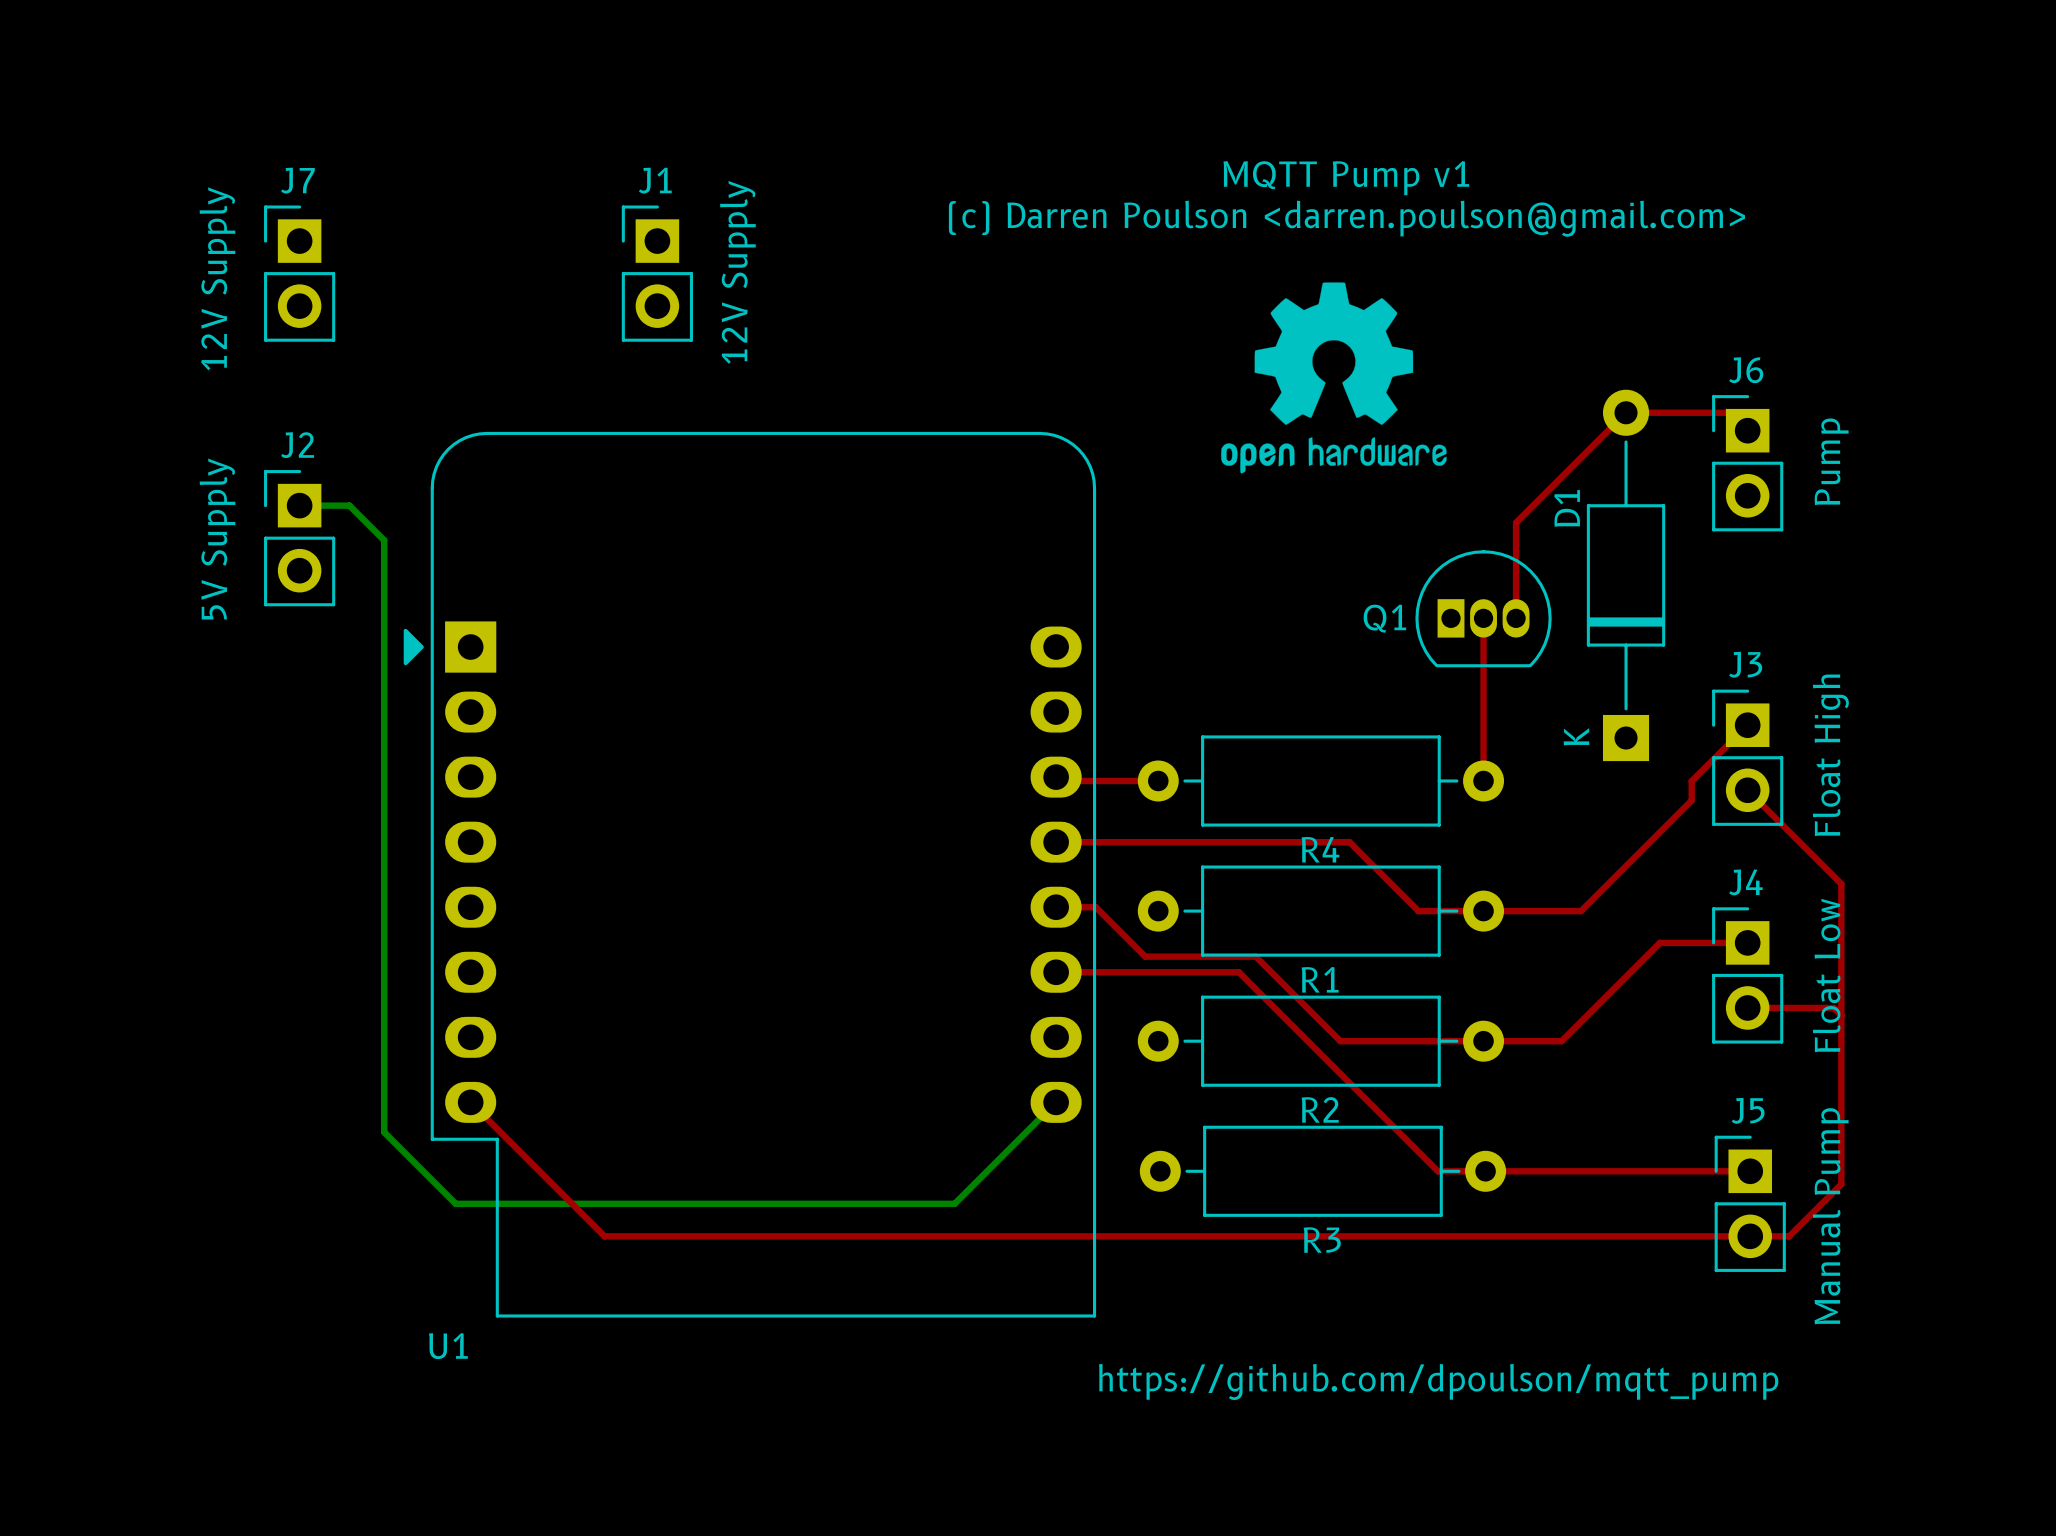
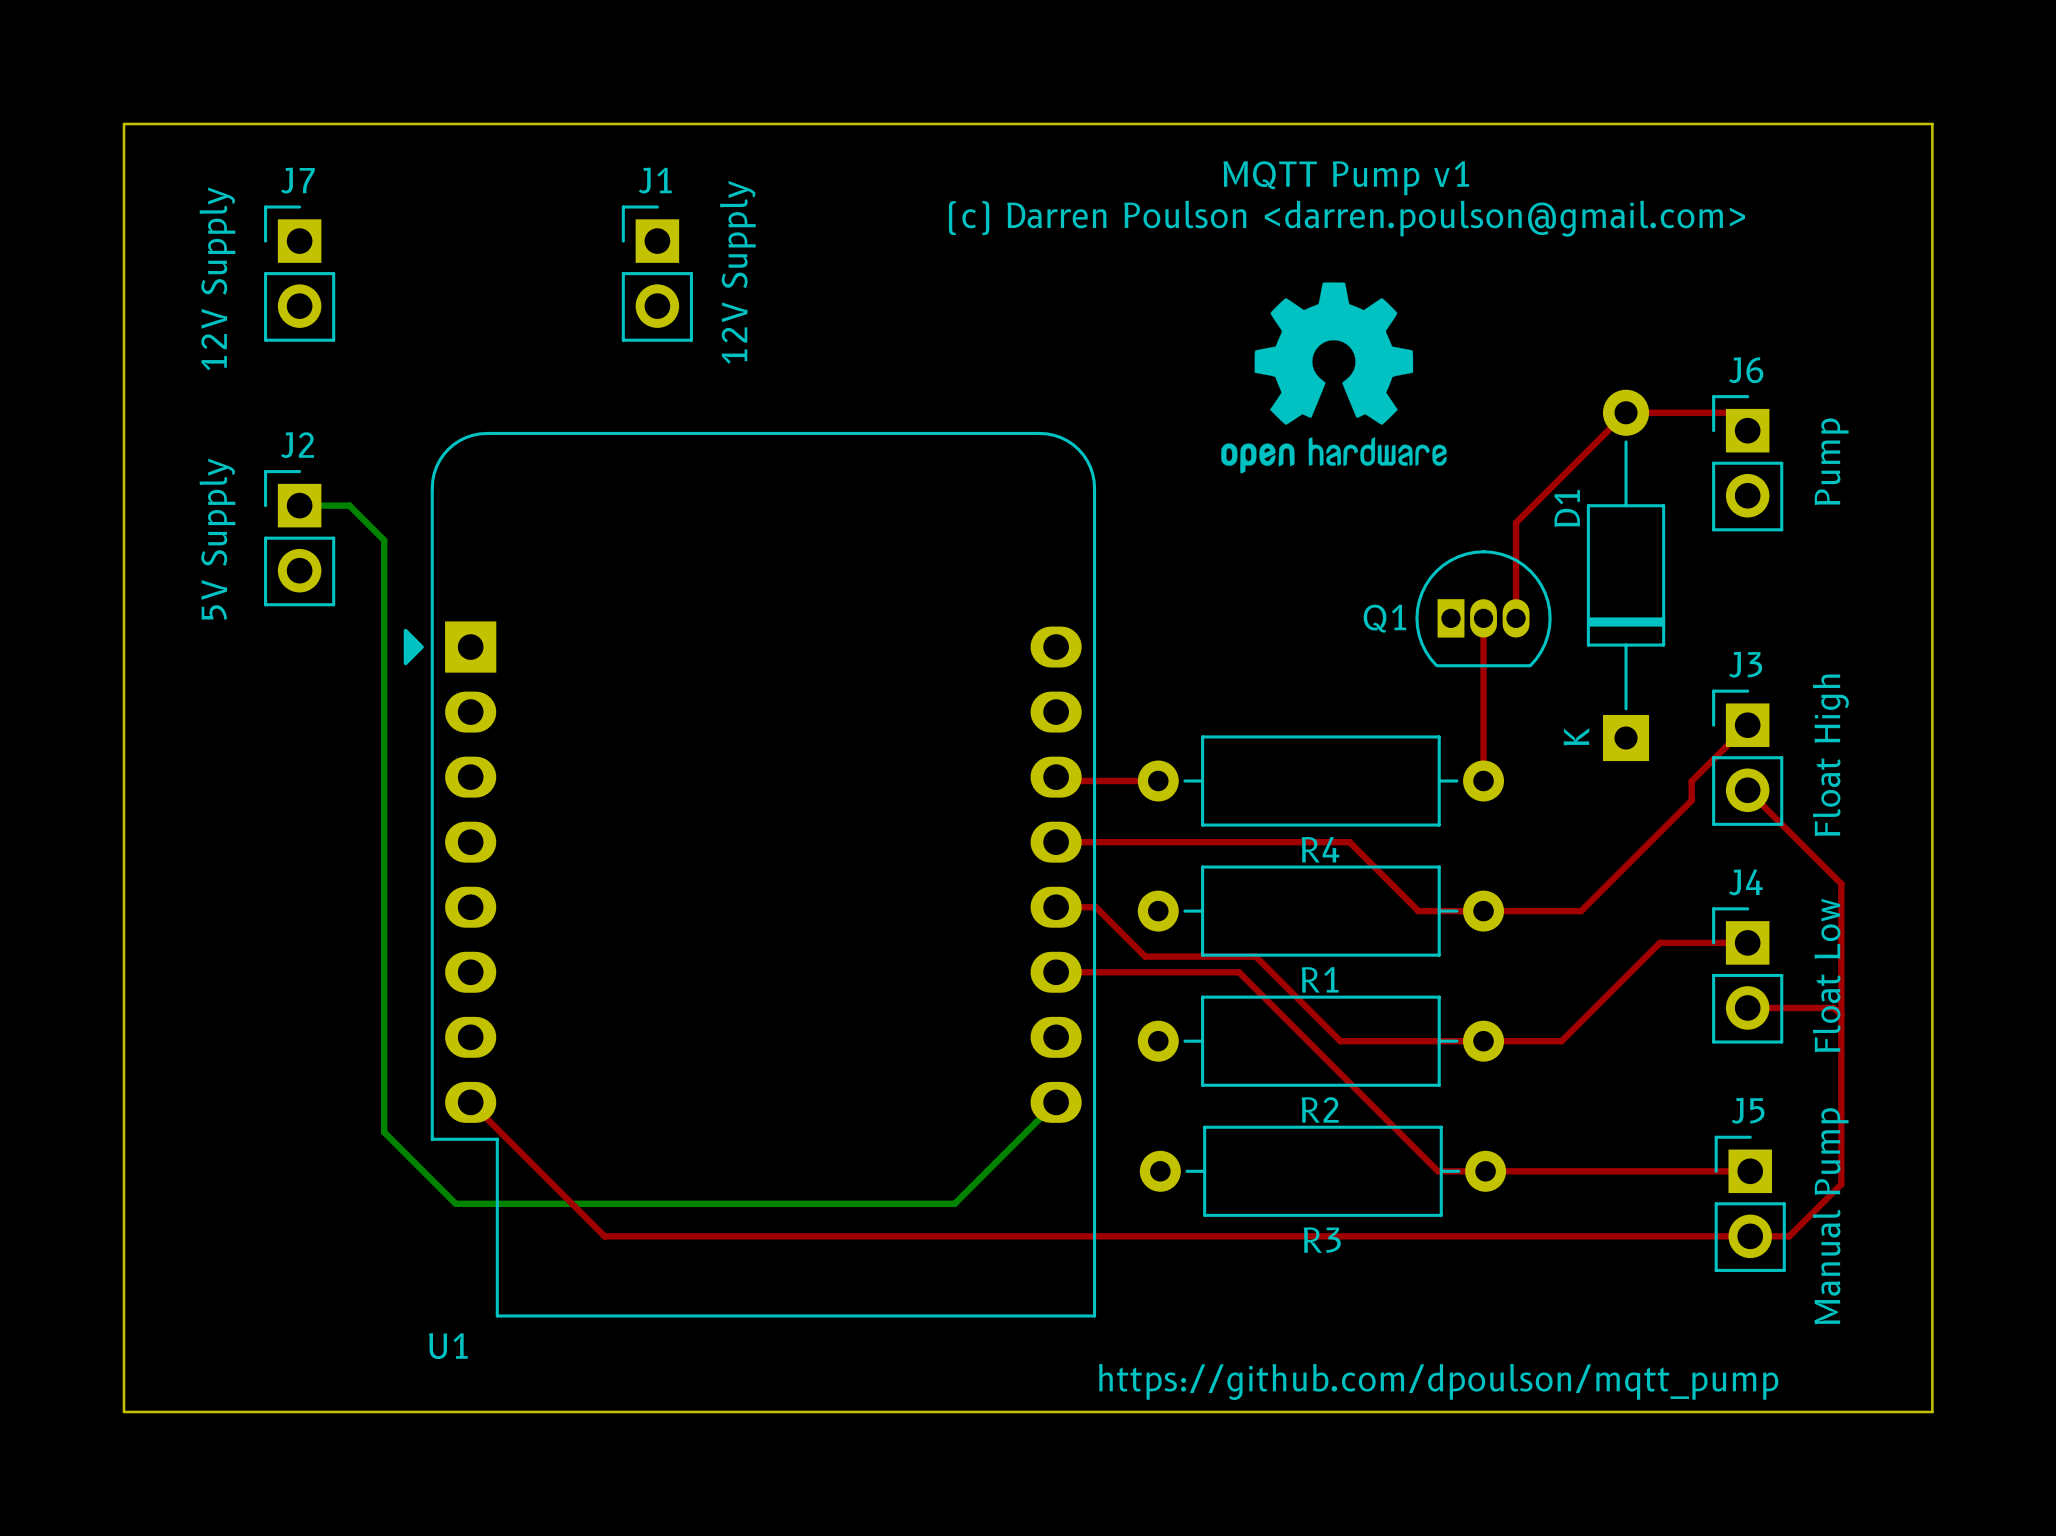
board edge: none -> (123, 123) (1932, 123) (1932, 1411) (123, 1411) (123, 123)

